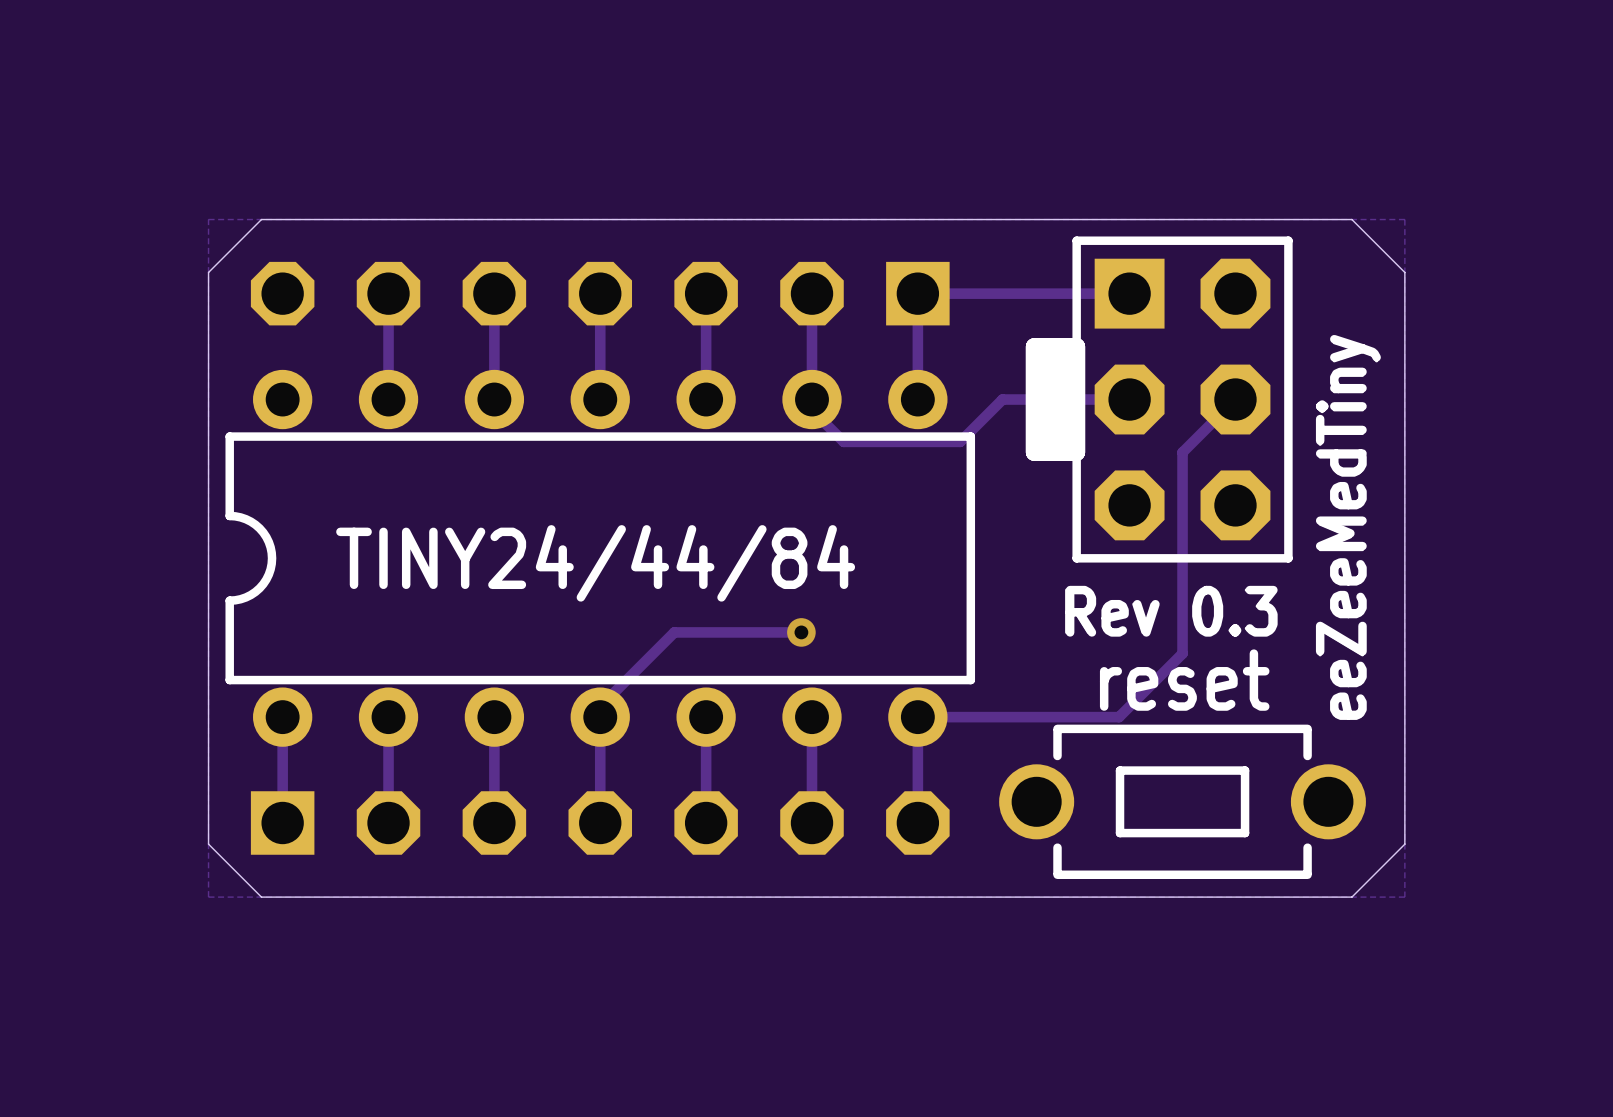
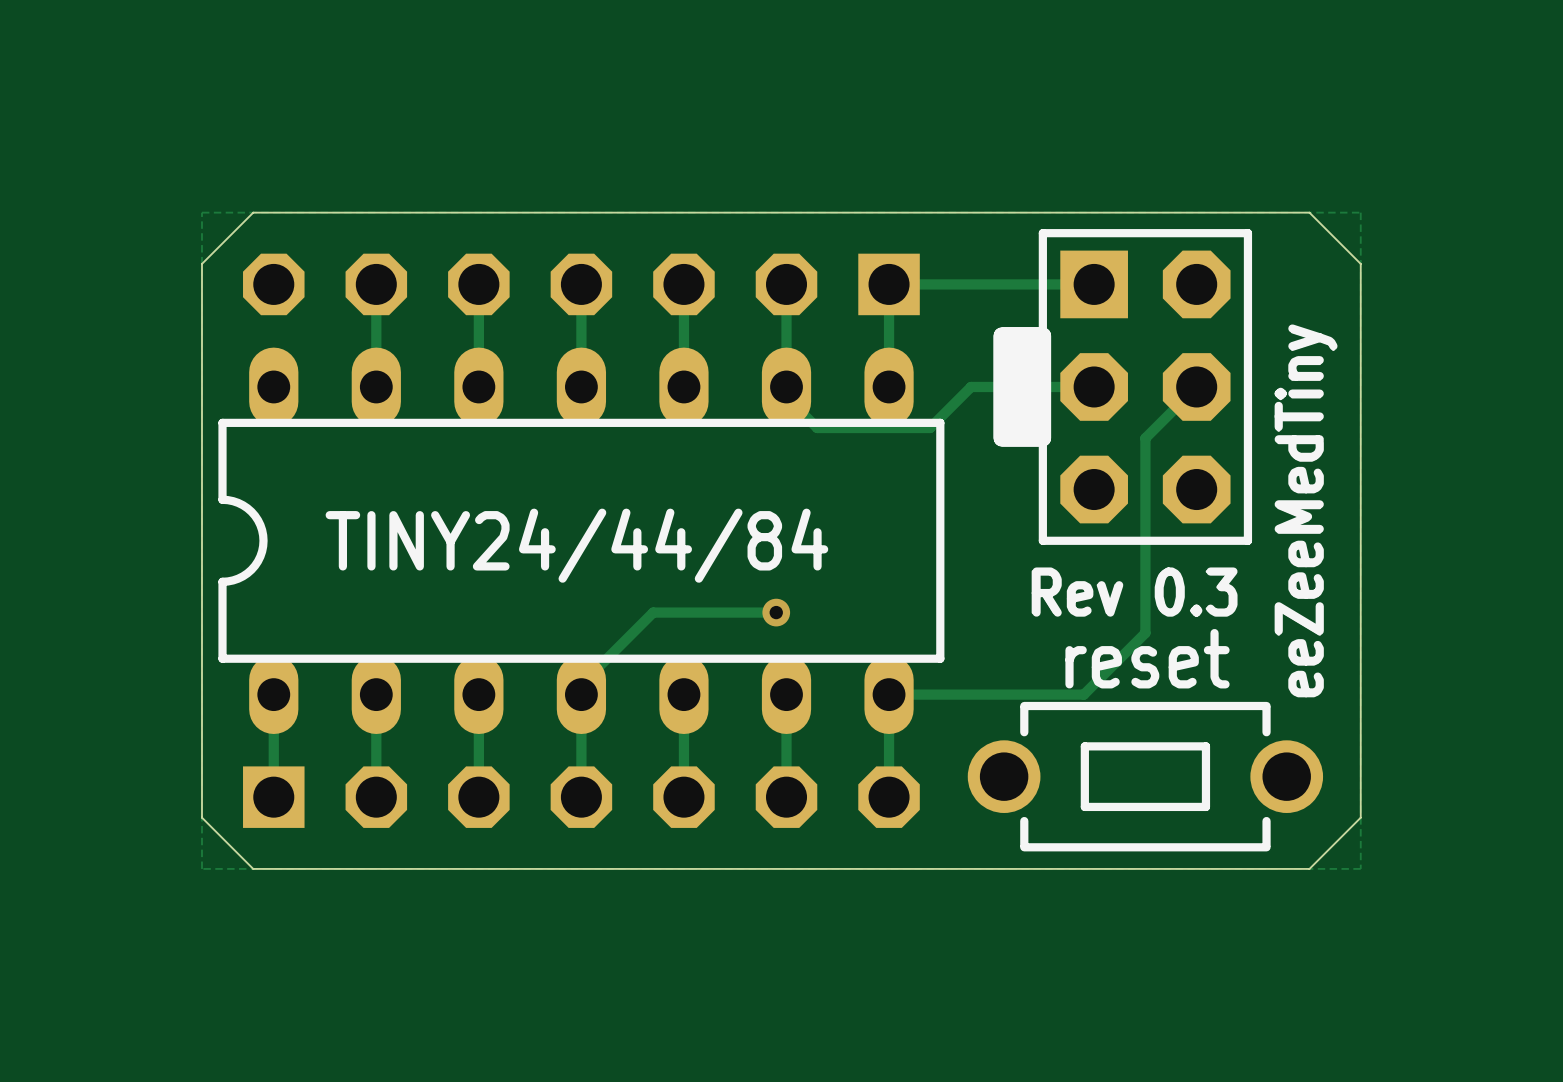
part footprint: [226, 369, 974, 747] -> [219, 347, 944, 734]

